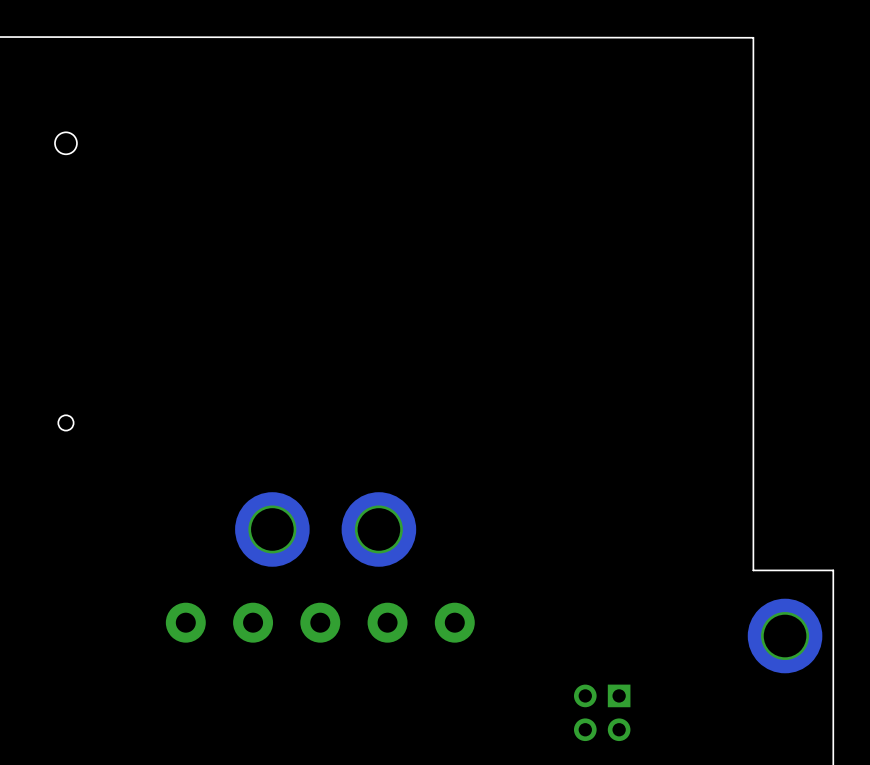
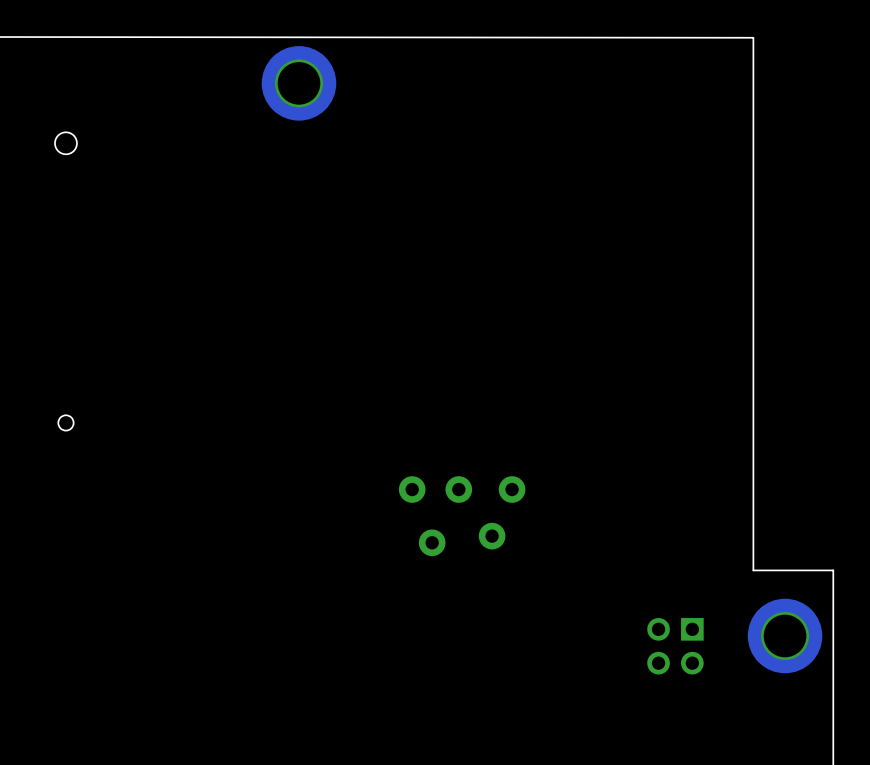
part: none -> (299, 83)
part: none -> (412, 489)
part: none -> (458, 489)
part: none -> (512, 489)
part: (272, 529) -> none
part: (378, 529) -> none
part: none -> (492, 536)
part: none -> (432, 542)
part: (185, 622) -> none
part: (253, 622) -> none
part: (320, 622) -> none
part: (387, 622) -> none
part: (454, 622) -> none
part position: (602, 712) -> (675, 646)

